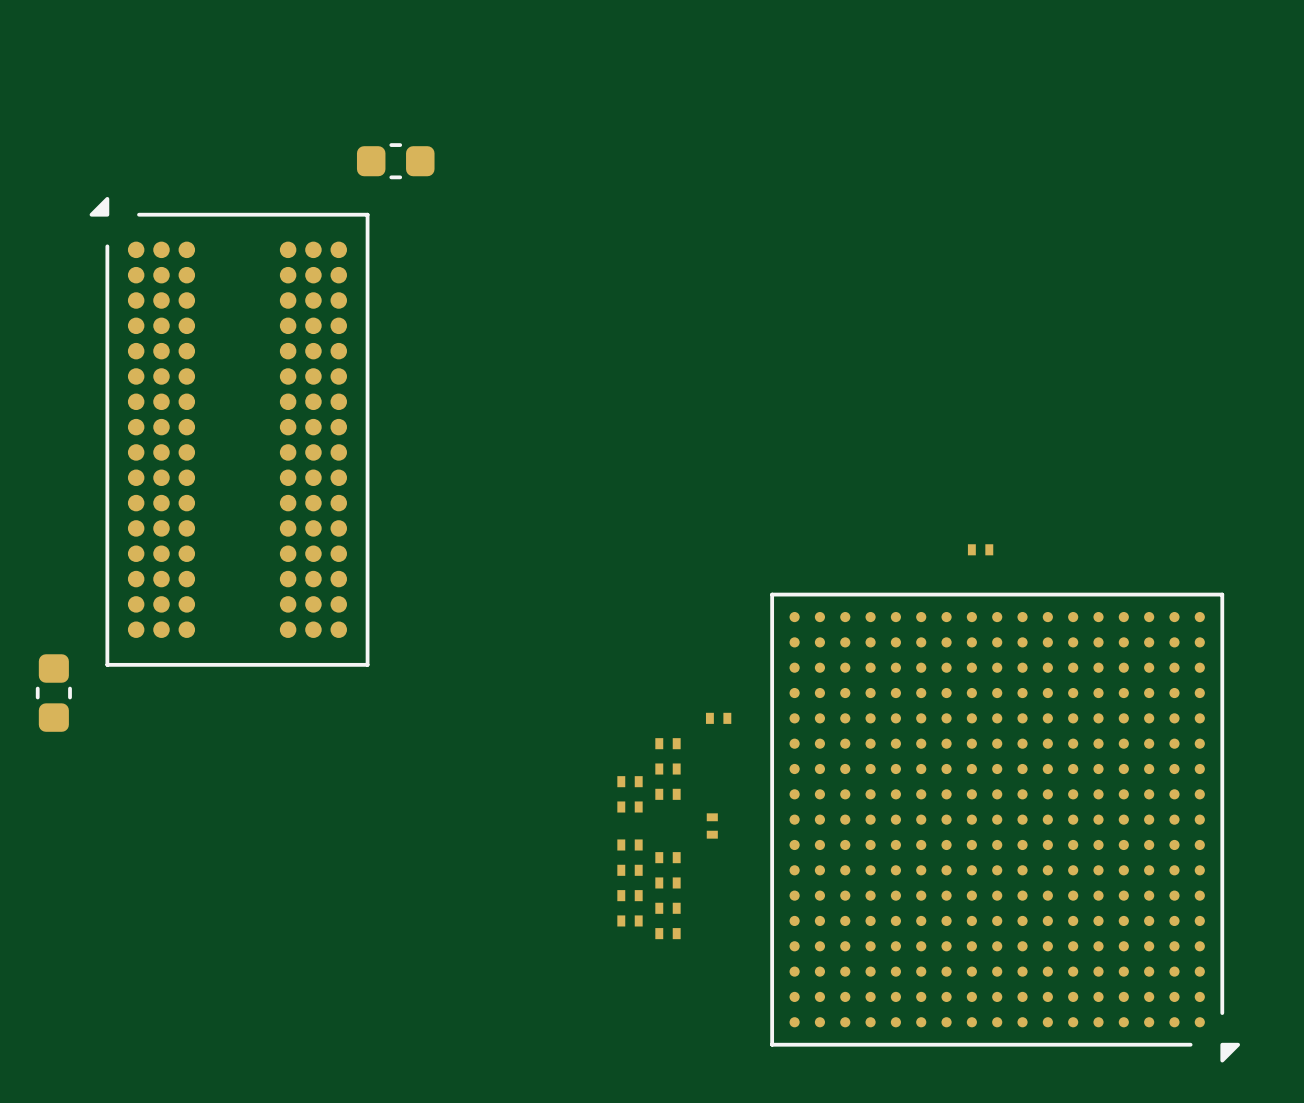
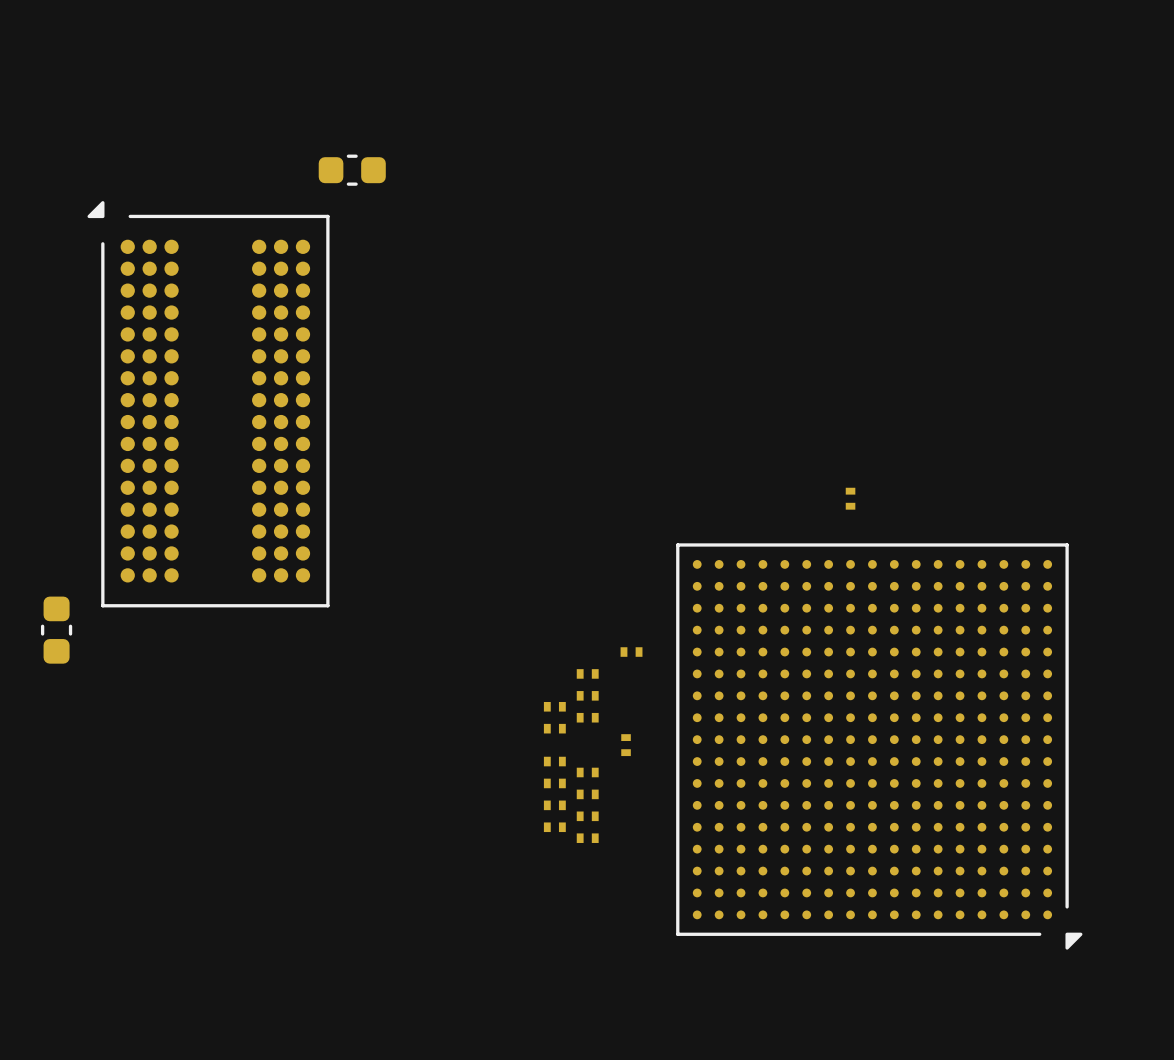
part rotation: 0° (980, 549) -> 90° clockwise (850, 498)

